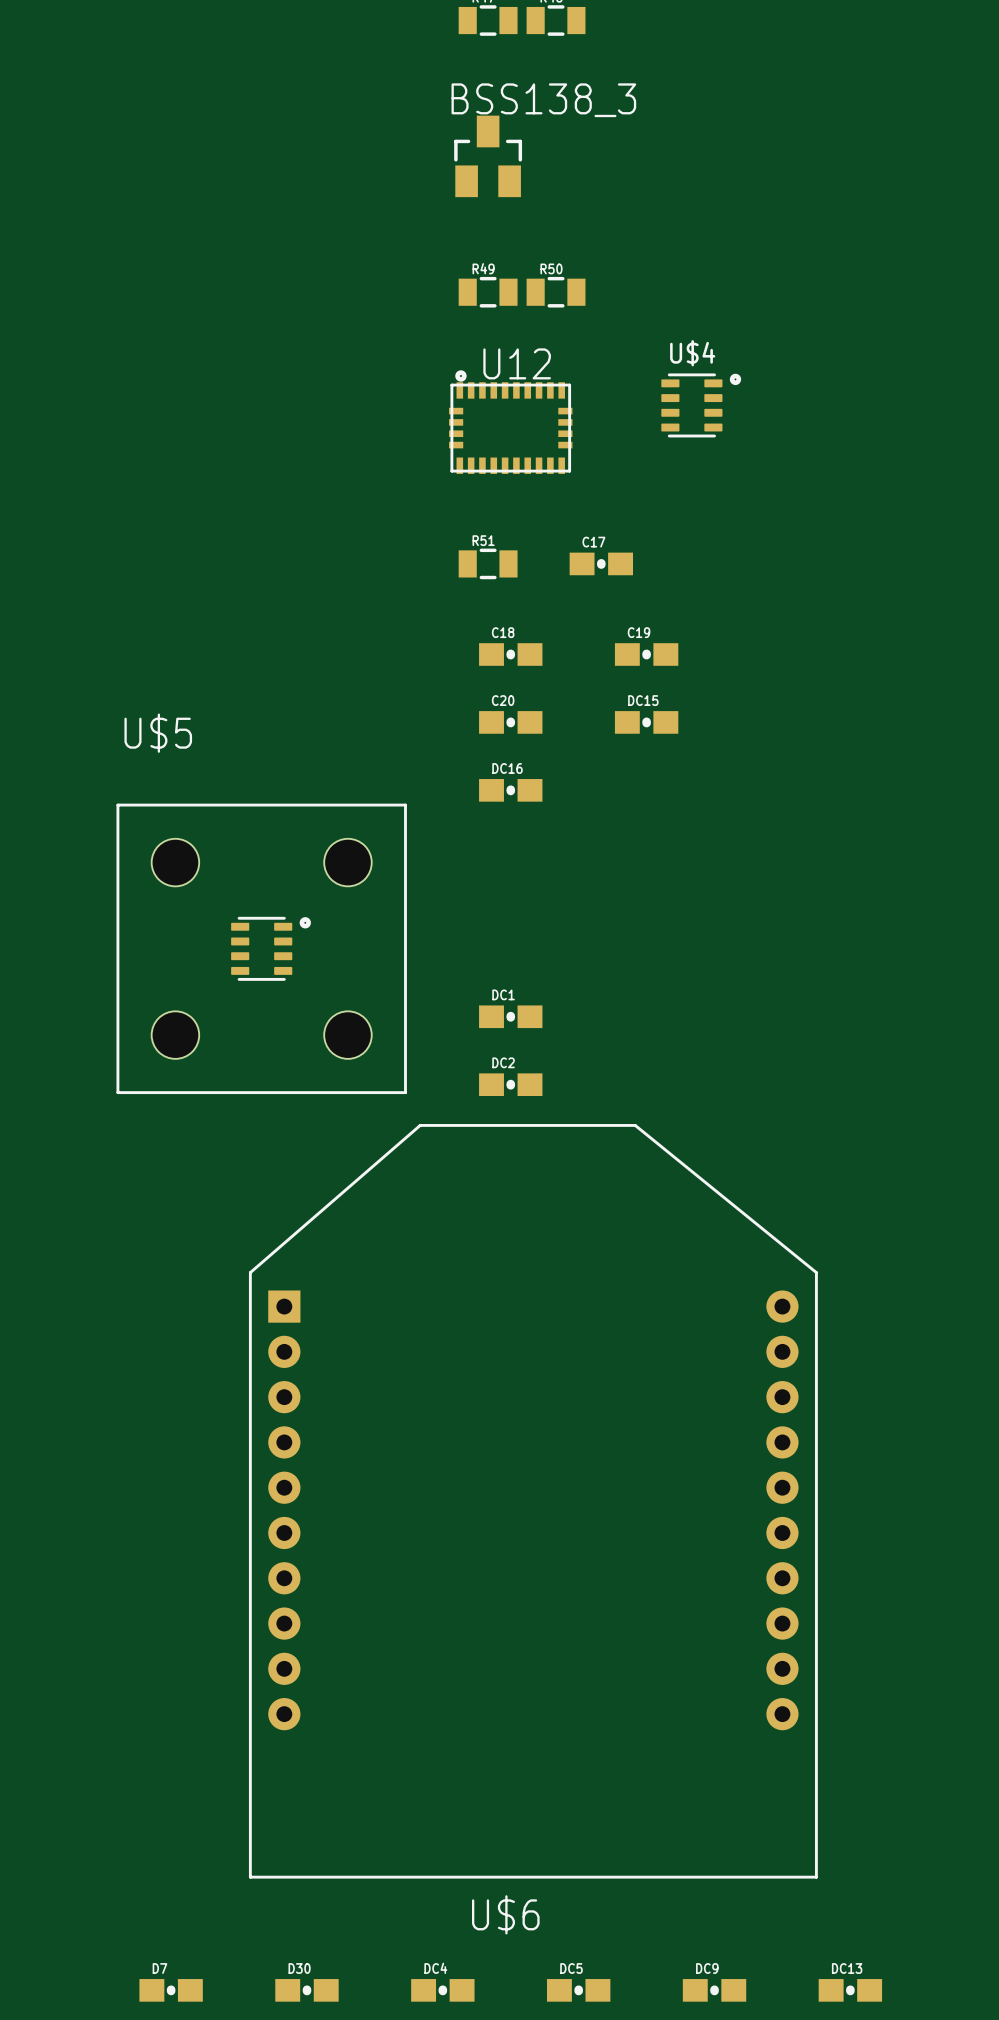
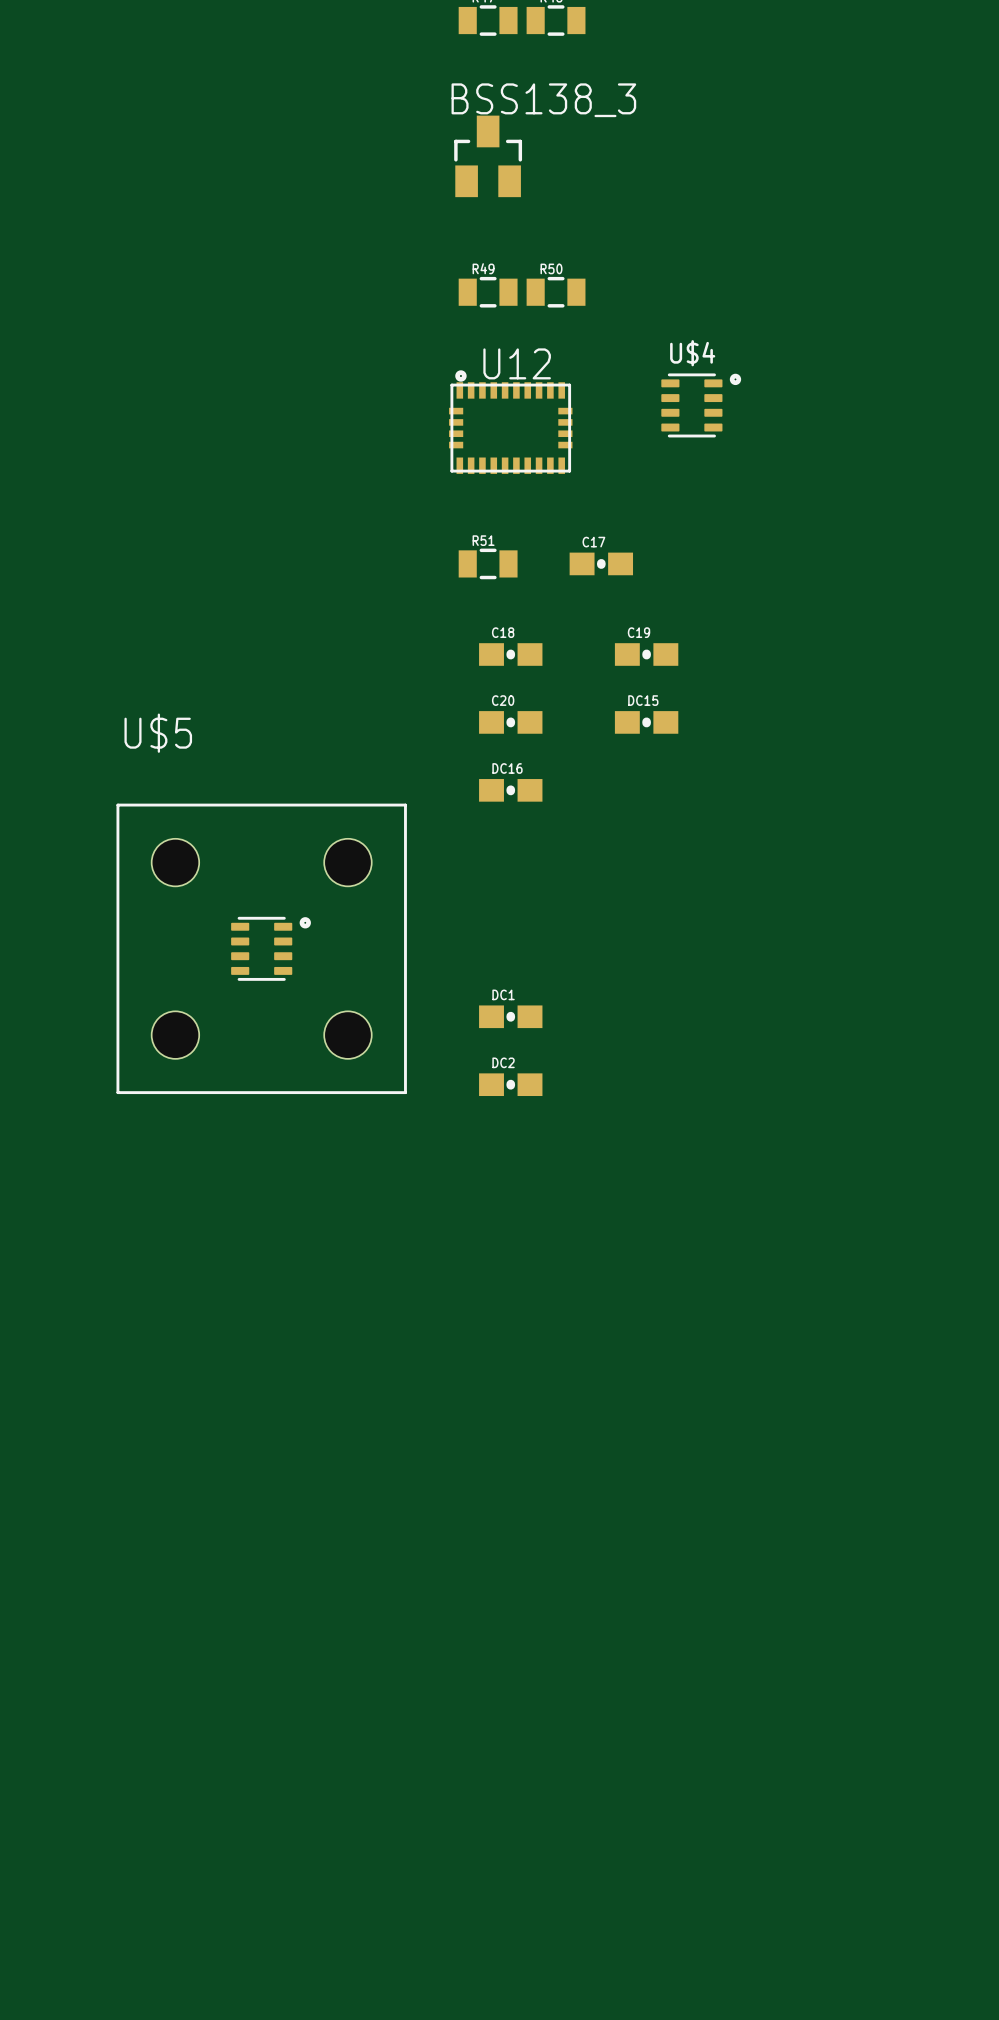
U$6: (533, 1501) -> none
D7: (171, 1990) -> none
D30: (306, 1990) -> none
DC4: (442, 1990) -> none
DC5: (578, 1990) -> none
DC9: (714, 1990) -> none
DC13: (850, 1990) -> none

